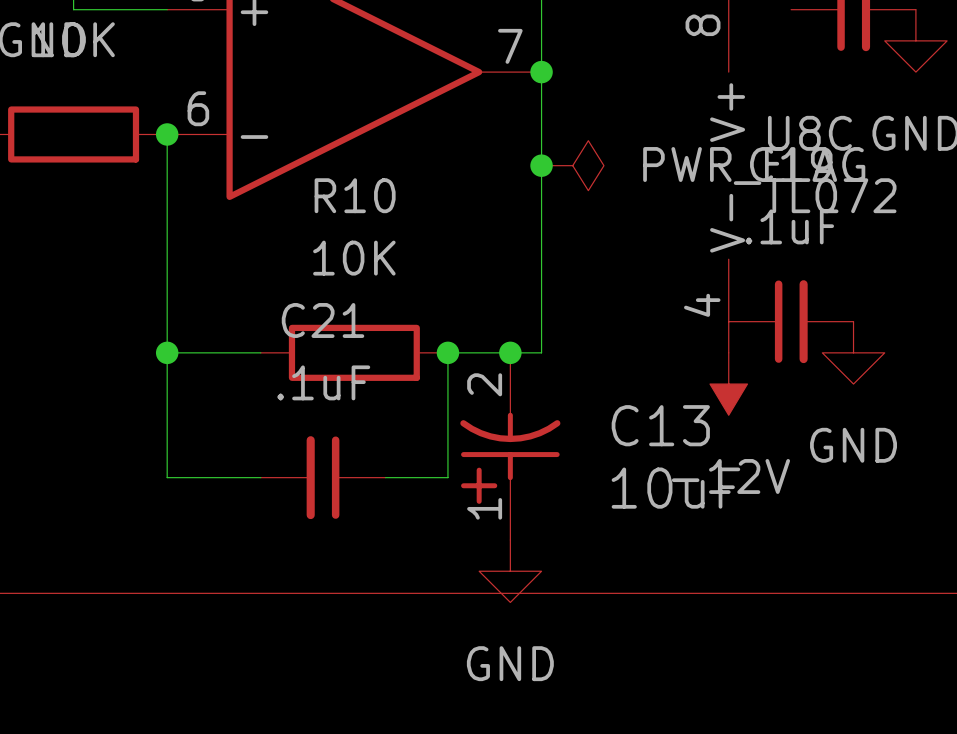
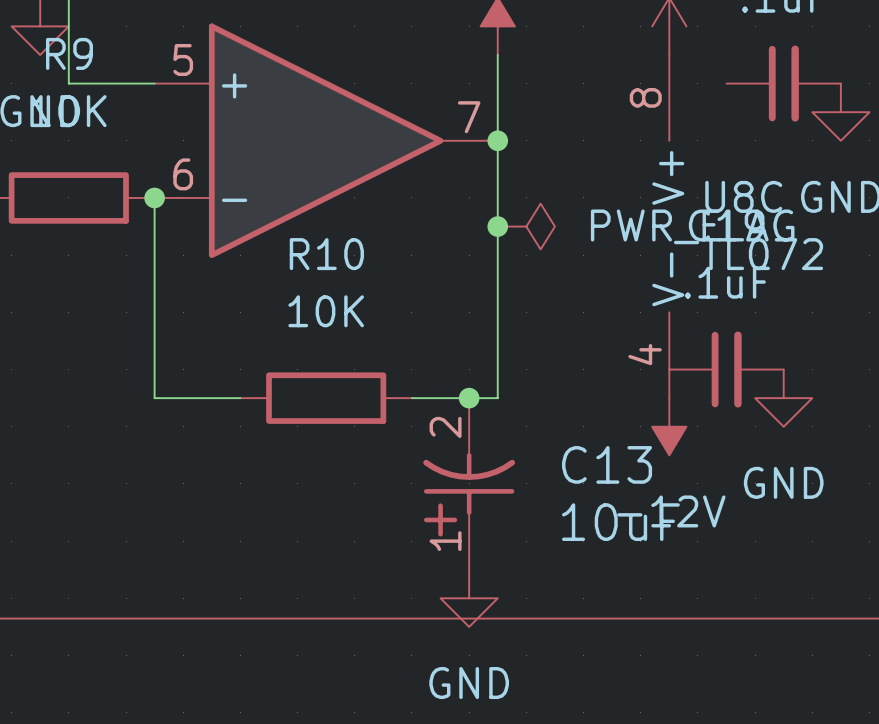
wire: (167, 352) (167, 477) (260, 477) -> none
junction: (167, 352) -> none
wire: (447, 352) (447, 477) (385, 477) -> none
junction: (447, 352) -> none
C21: .1uF (323, 477) -> none

